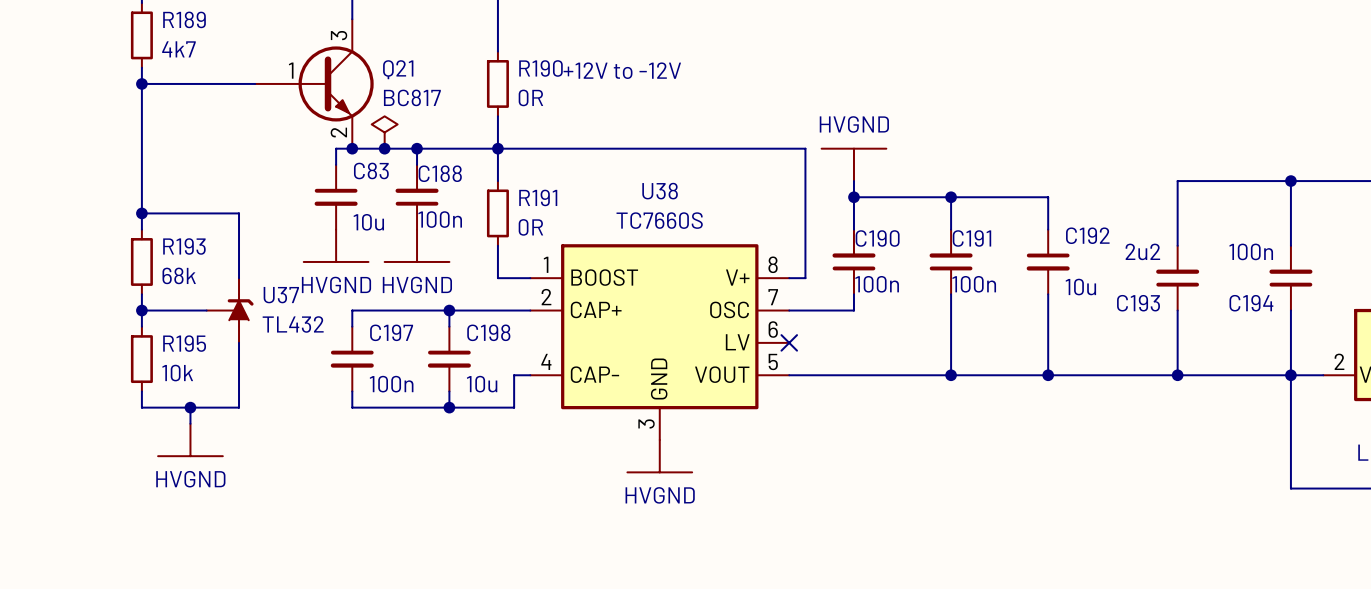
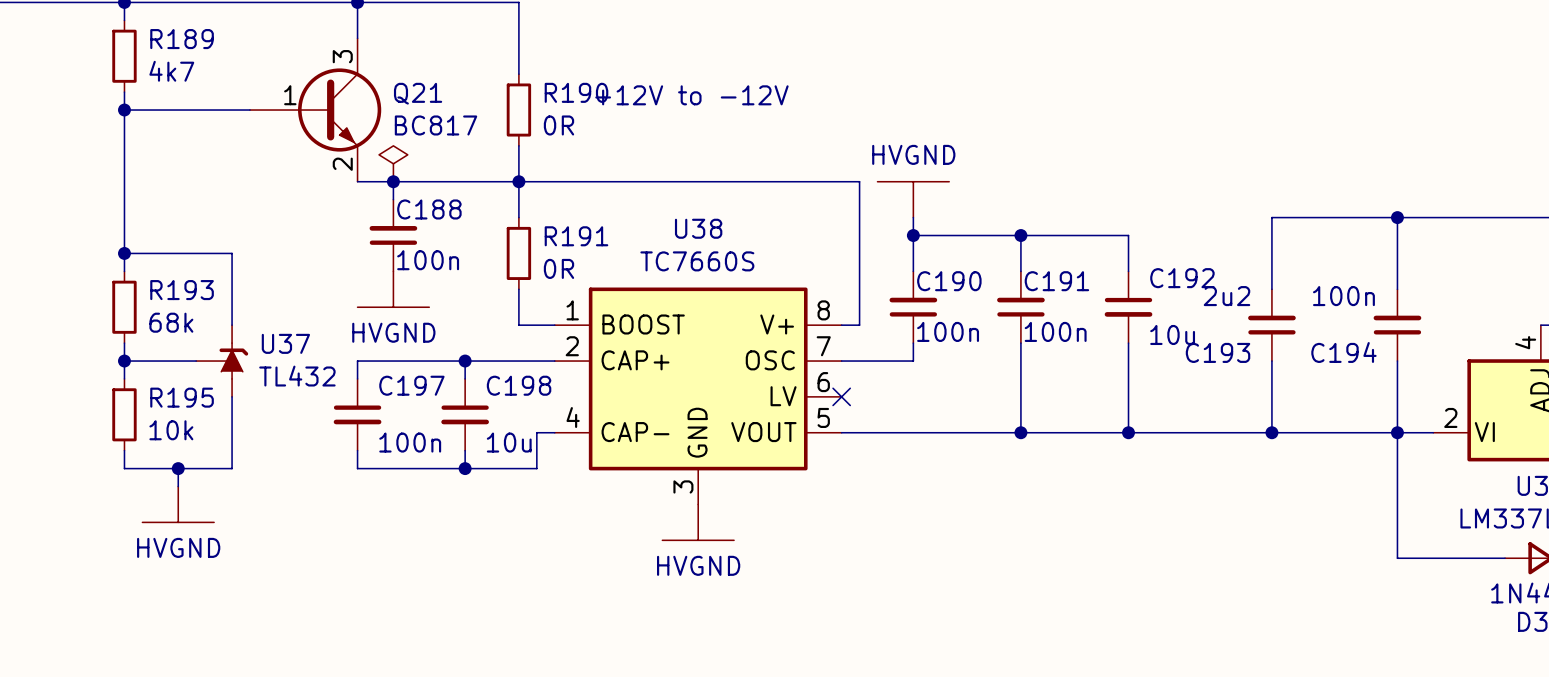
wire: (352, 148) (336, 148) (336, 164) -> none
junction: (352, 148) -> none
wire: (417, 148) (417, 164) -> (393, 181) (393, 199)
junction: (417, 148) -> none
C83: 10u (336, 197) -> none
C188 position: (417, 197) -> (393, 235)
power symbol: HVGND (336, 245) -> none
power symbol: none -> HVGND (393, 289)
power symbol: HVGND (417, 245) -> none

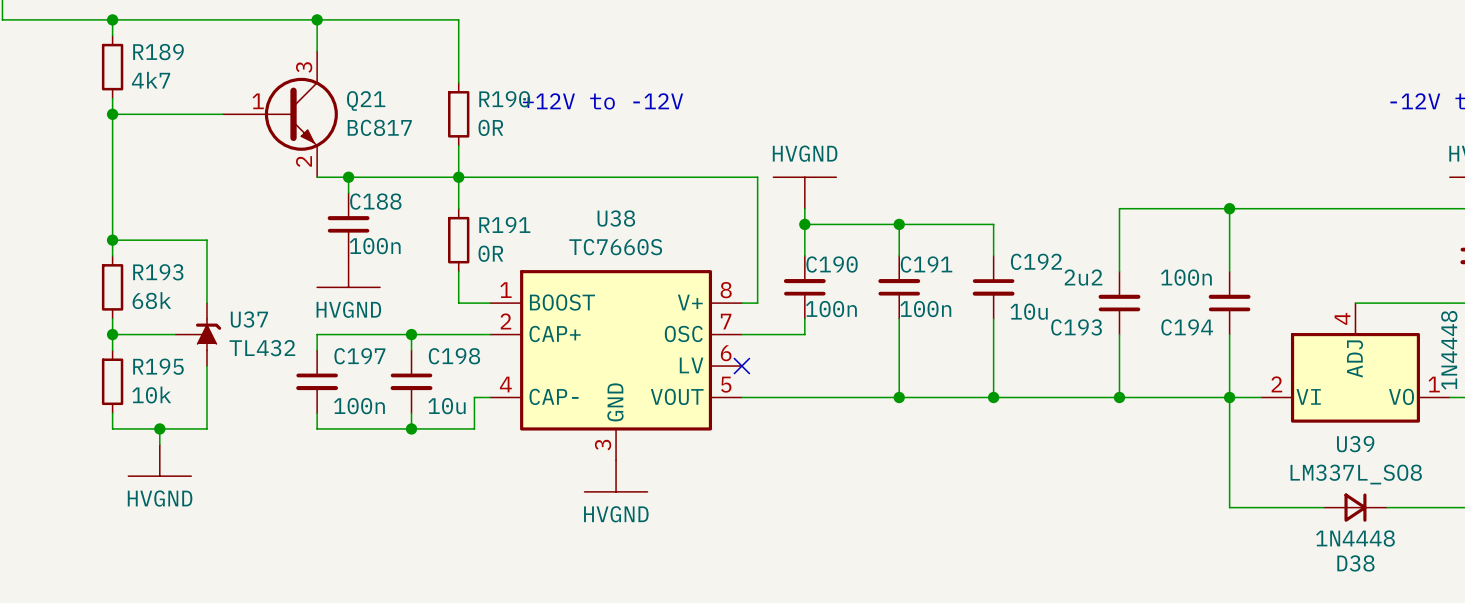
power symbol: (393, 163) -> none

